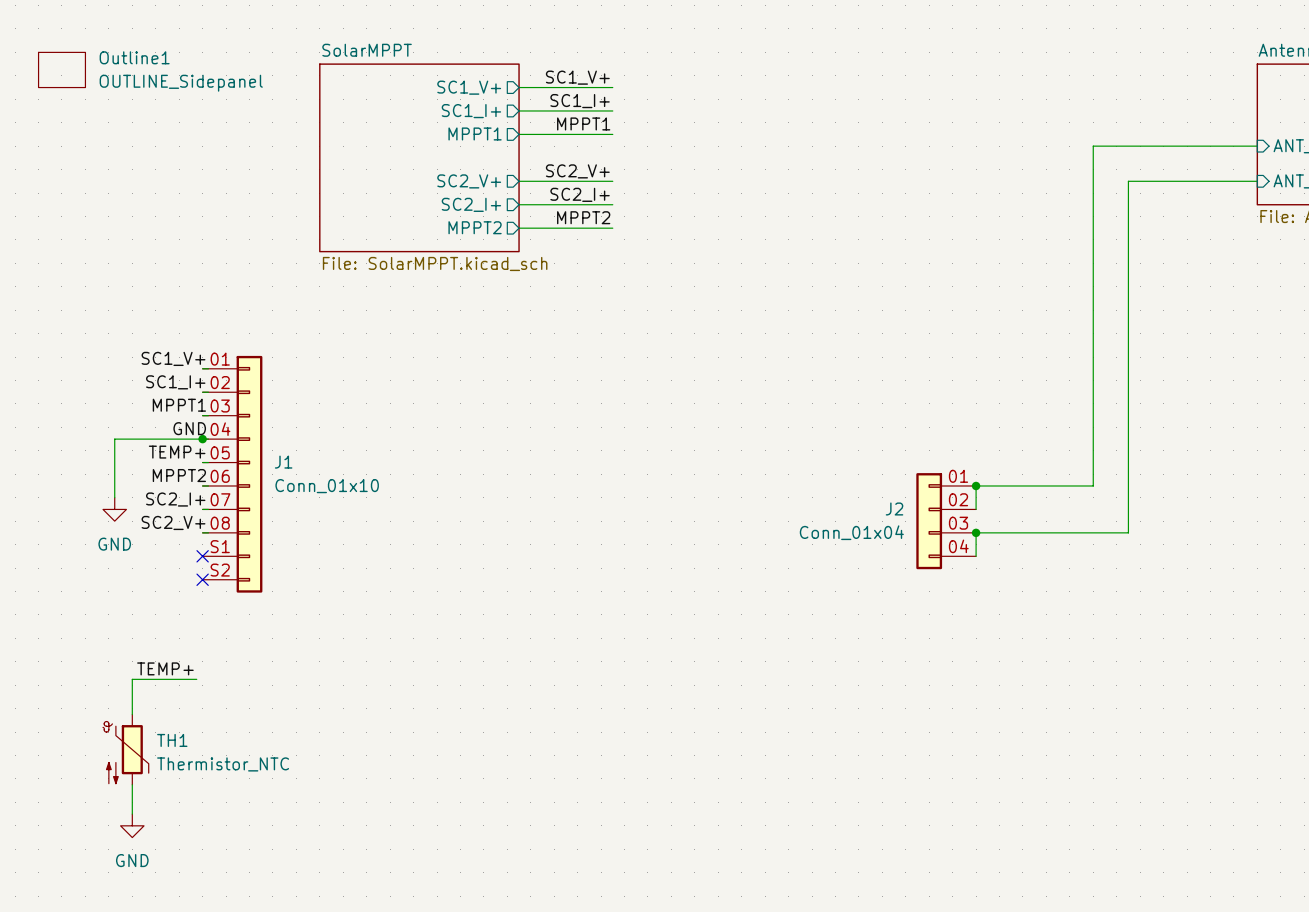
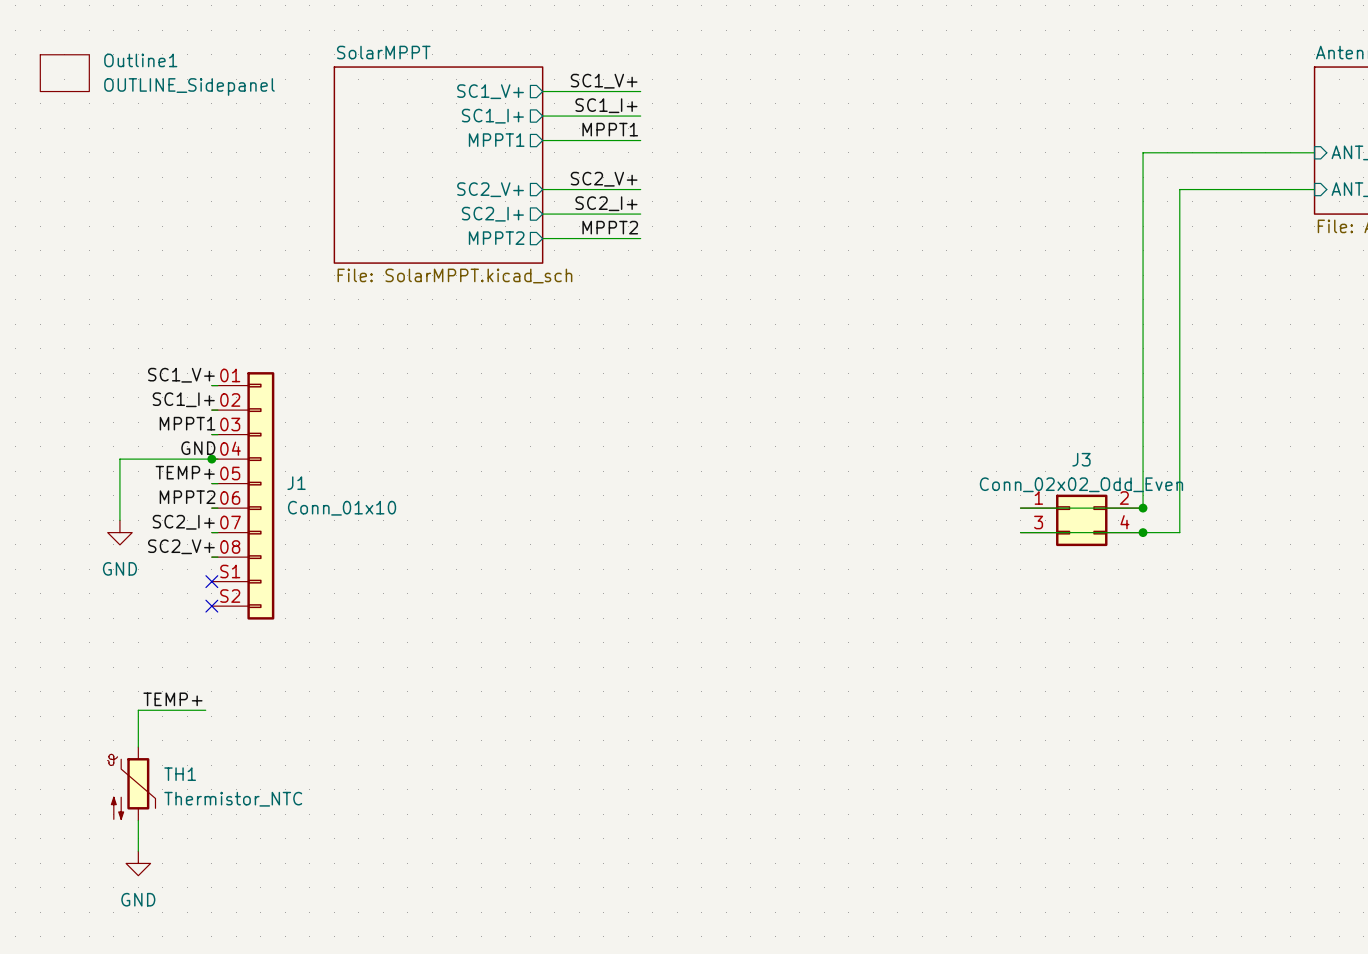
wire: (976, 485) (976, 509) -> none
junction: (976, 485) -> none
junction: none -> (1143, 508)
J3: none -> Conn_02x02_Odd_Even (1081, 520)
junction: none -> (1143, 532)
wire: (1128, 509) (1128, 532) (976, 532) (976, 556) -> (1179, 532) (1020, 532)
J2: Conn_01x04 (946, 521) -> none
junction: (976, 532) -> none

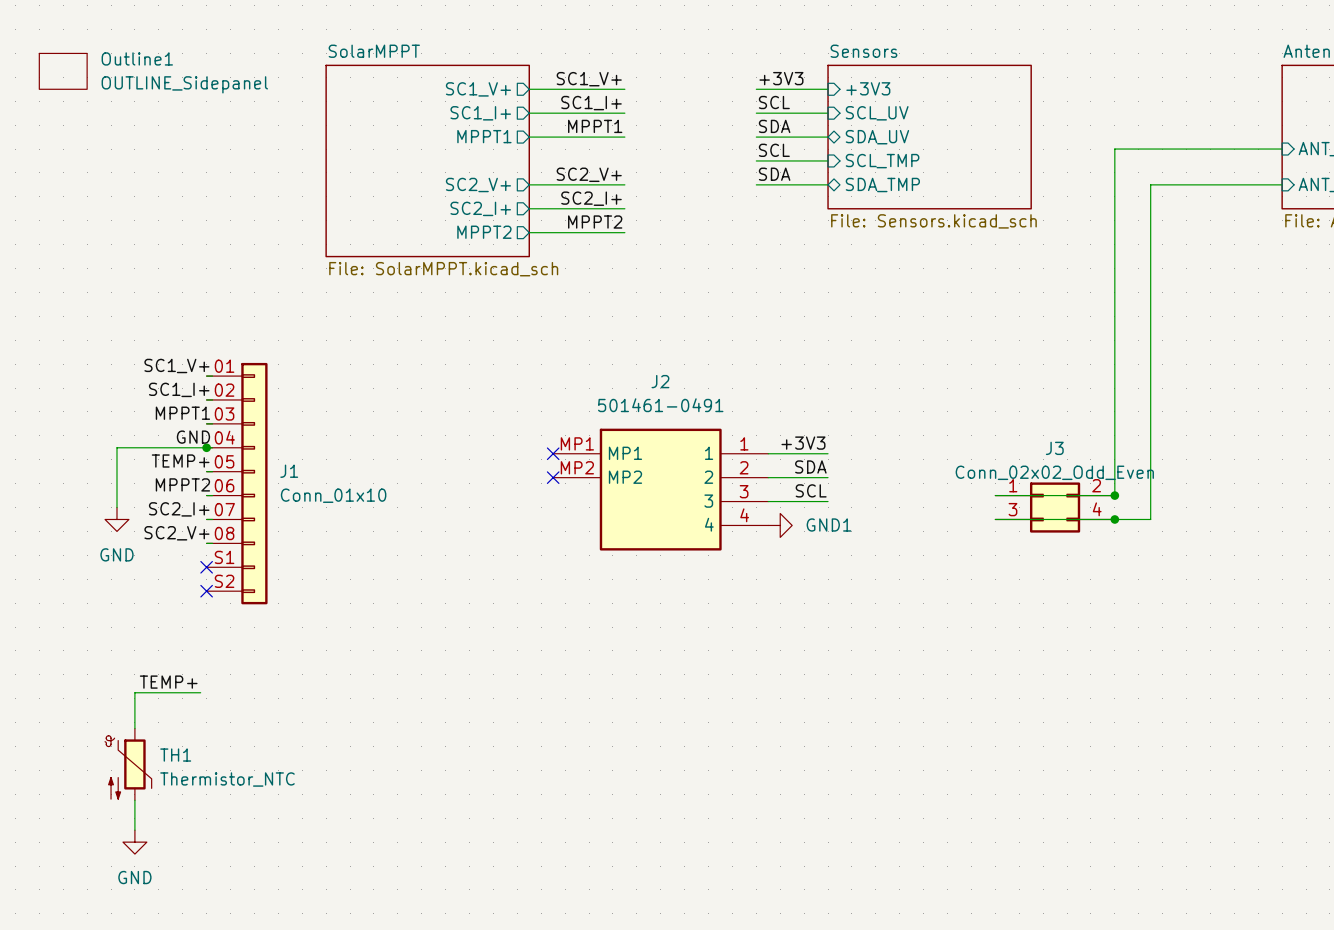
label: none -> +3V3 (781, 78)
wire: none -> (756, 89) (828, 89)
sheet pin: none -> +3V3 (868, 88)
label: none -> SCL (774, 102)
wire: none -> (756, 113) (828, 113)
sheet pin: none -> SCL_UV (877, 113)
label: none -> SDA (774, 126)
wire: none -> (756, 137) (828, 137)
sheet pin: none -> SDA_UV (877, 137)
sheet Sensors: none -> File: Sensors.kicad_sch (929, 137)
label: none -> SCL (774, 150)
wire: none -> (756, 160) (828, 160)
sheet pin: none -> SCL_TMP (882, 161)
label: none -> SDA (774, 174)
wire: none -> (756, 184) (828, 184)
sheet pin: none -> SDA_TMP (882, 185)
label: none -> +3V3 (803, 443)
no-connect mark: none -> (553, 453)
wire: none -> (768, 453) (828, 453)
label: none -> SDA (810, 466)
no-connect mark: none -> (553, 477)
wire: none -> (768, 477) (828, 477)
part: none -> (660, 489)
label: none -> SCL (811, 490)
wire: none -> (768, 501) (828, 501)
power symbol: none -> GND1 (780, 525)

